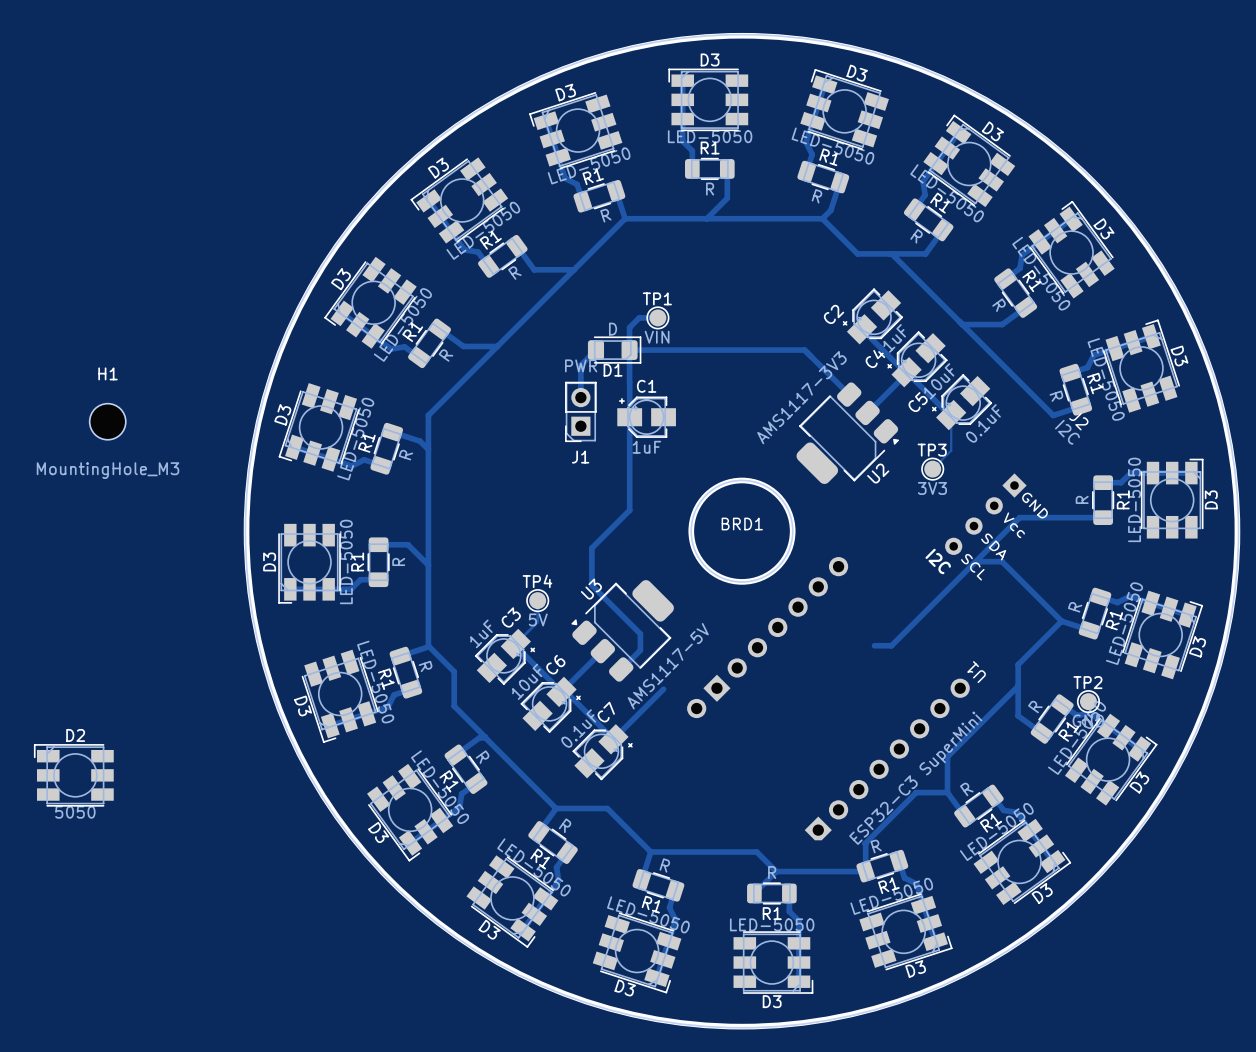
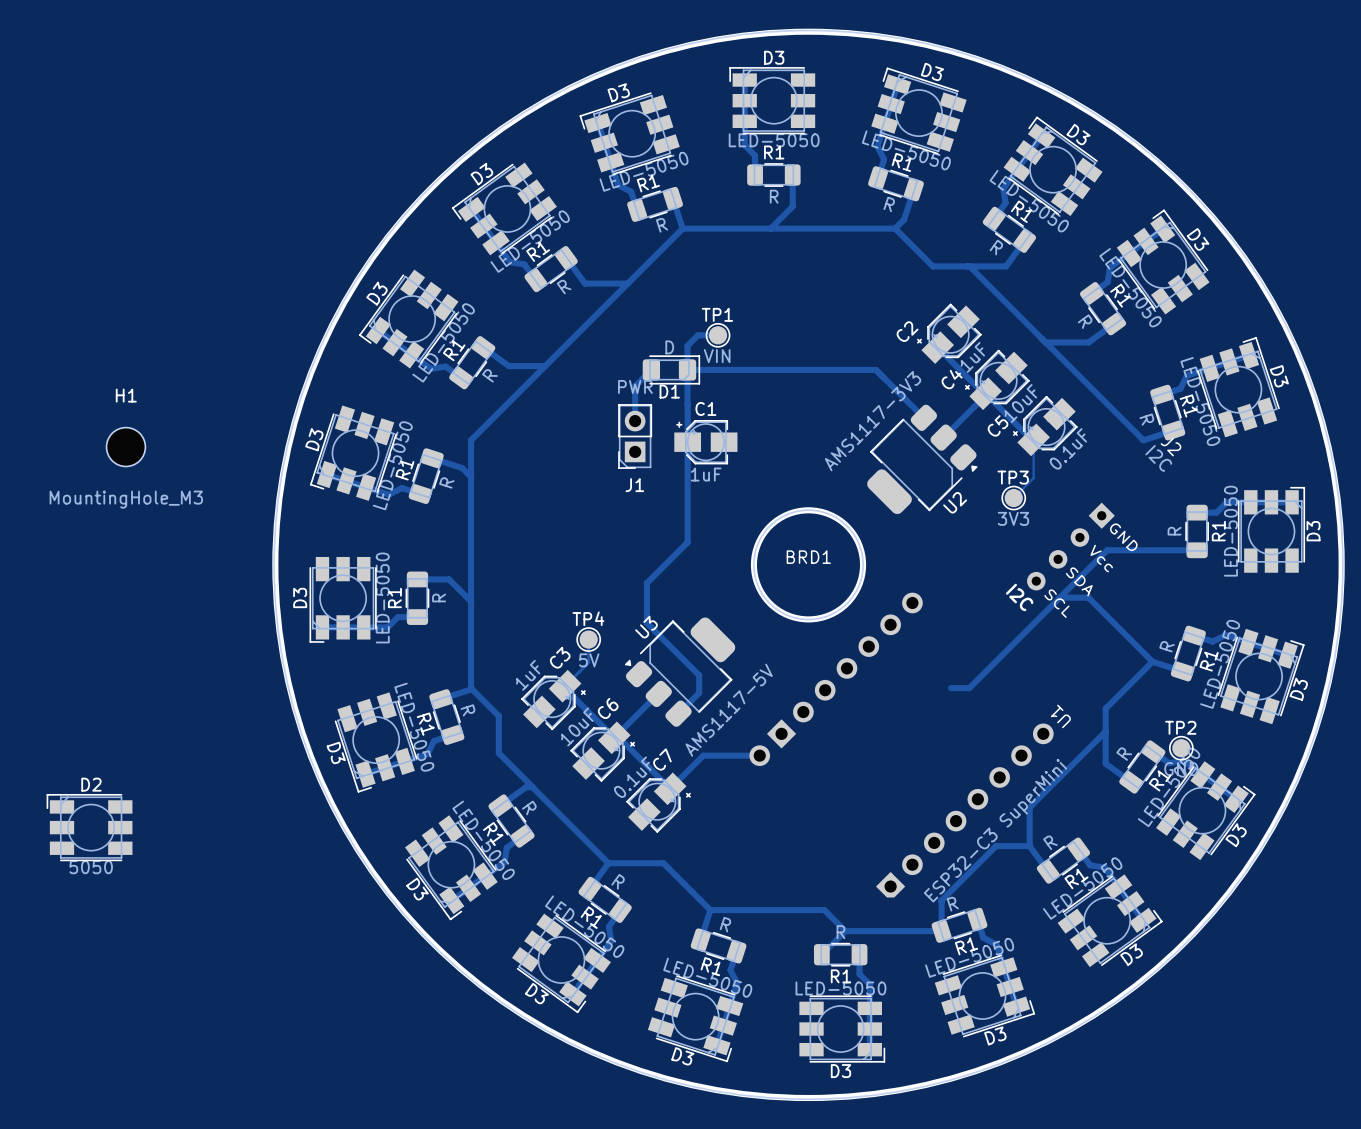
track: (663, 689) (644, 708) -> (759, 755) (703, 755)

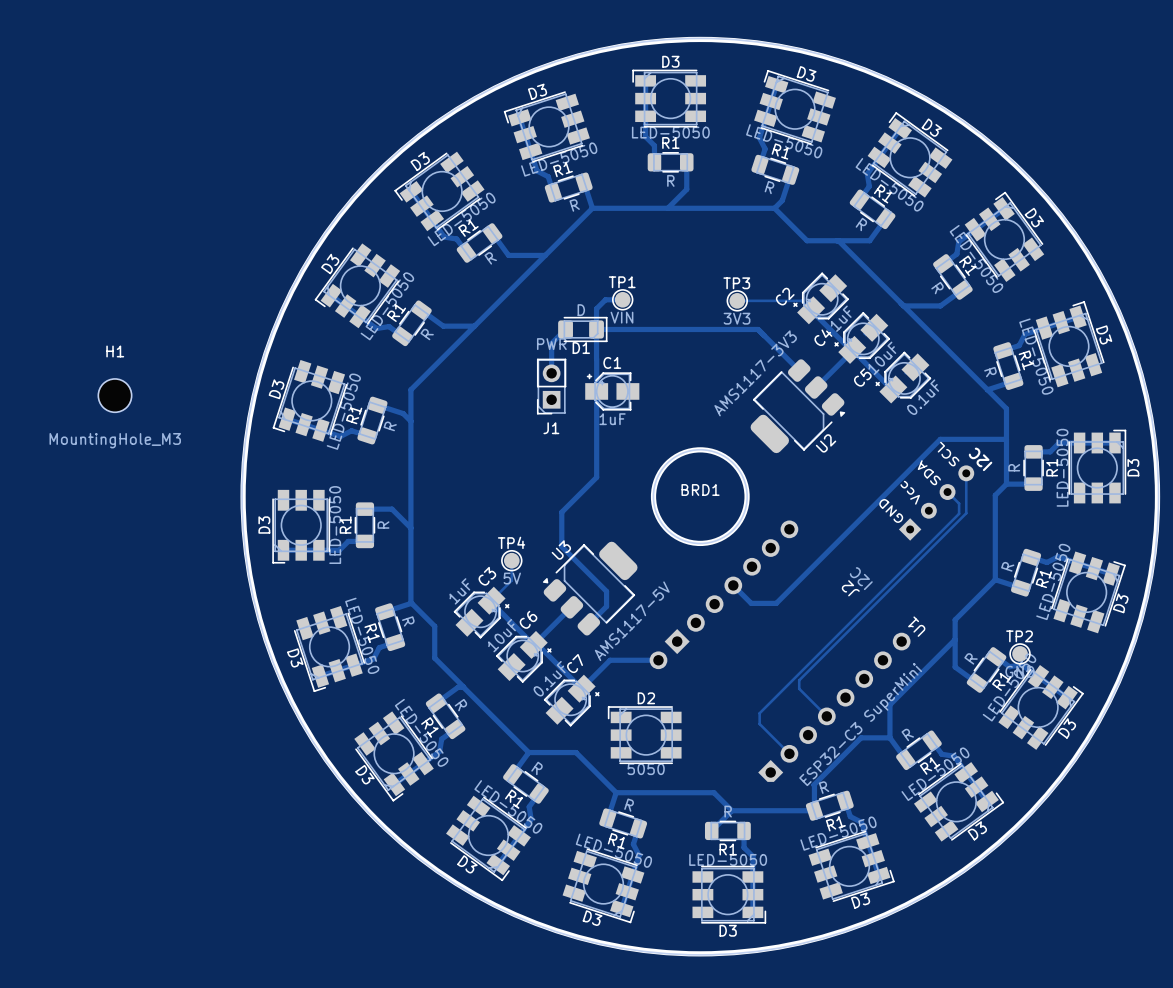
track: none -> (737, 300) (801, 300) (811, 310)
track: (1033, 439) (1033, 478) (1013, 498) -> none
TP3 position: (1013, 498) -> (737, 300)
track: none -> (1006, 439) (940, 439) (776, 603) (751, 603) (733, 585)
track: none -> (966, 473) (966, 513) (799, 680) (799, 688) (826, 716)
J2 rotation: 0° (1070, 546) -> 180° (936, 503)
track: (1165, 550) (1107, 550) (969, 688) (951, 688) -> none
track: none -> (947, 492) (959, 503) (959, 513) (759, 713) (759, 724) (789, 753)
track: (1059, 597) (1088, 597) (1152, 661) -> (987, 389) (1006, 408) (1006, 484) (995, 495) (995, 579)
D2 position: (89, 827) -> (644, 735)

